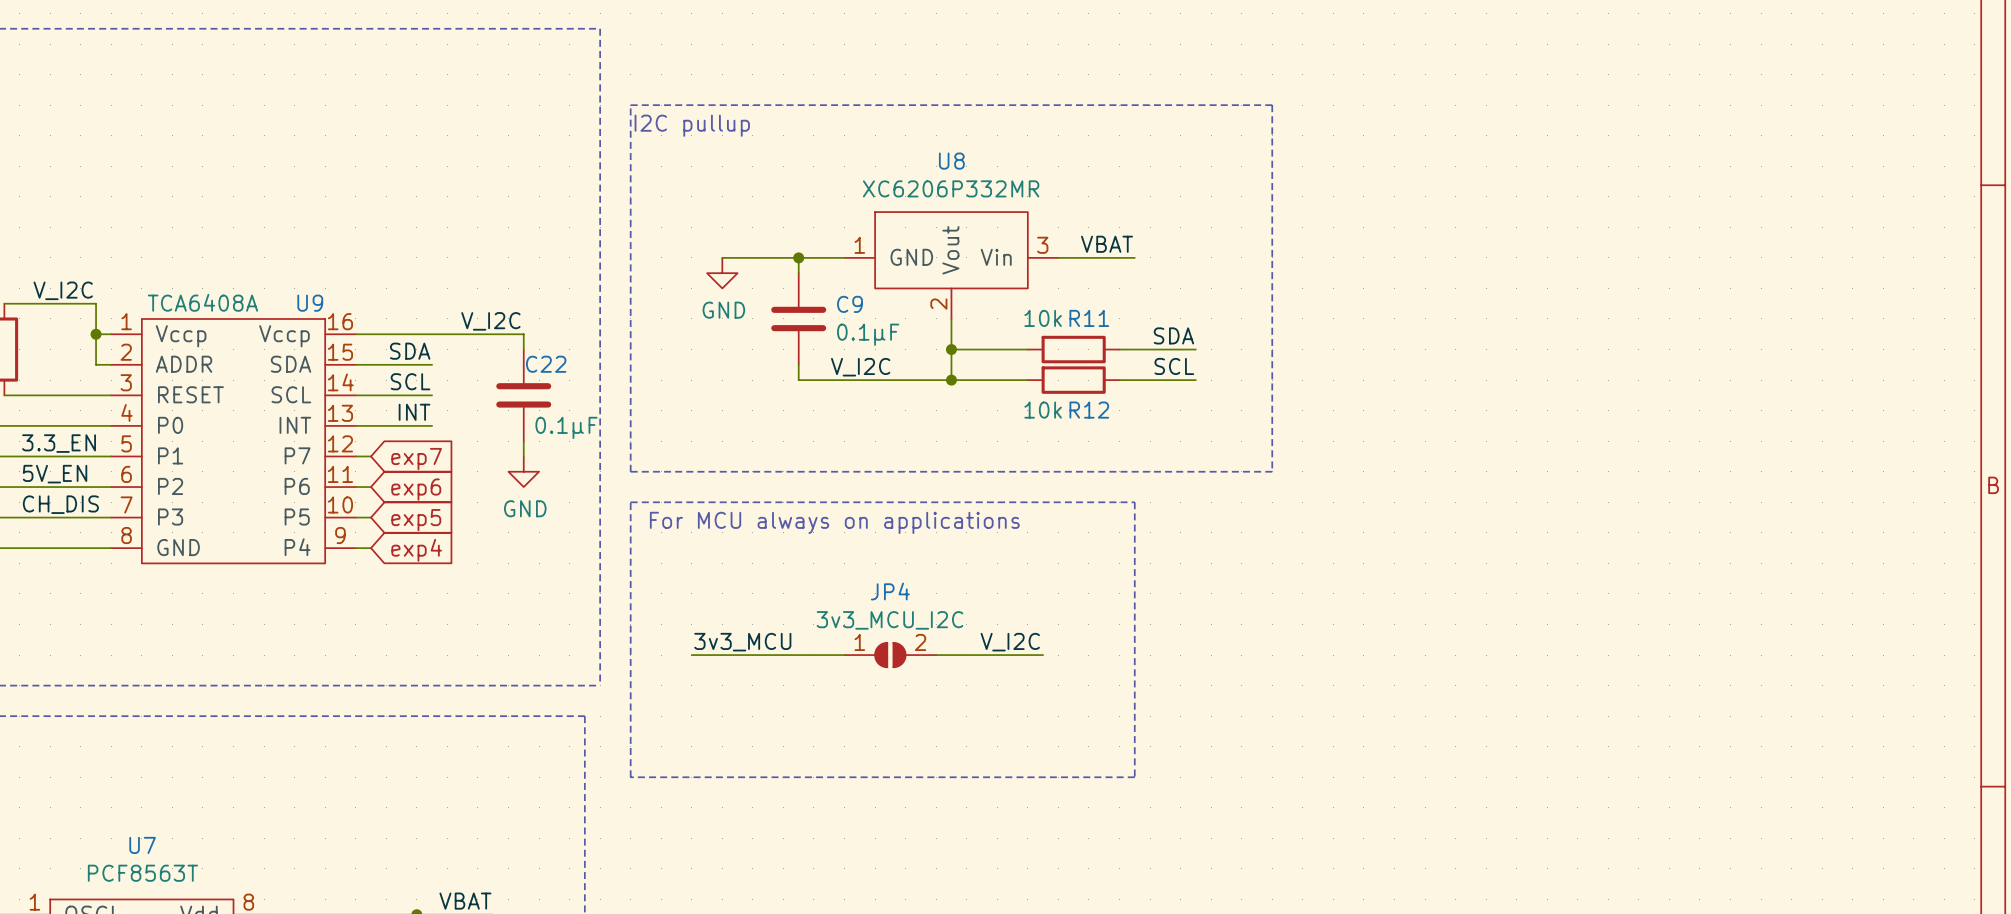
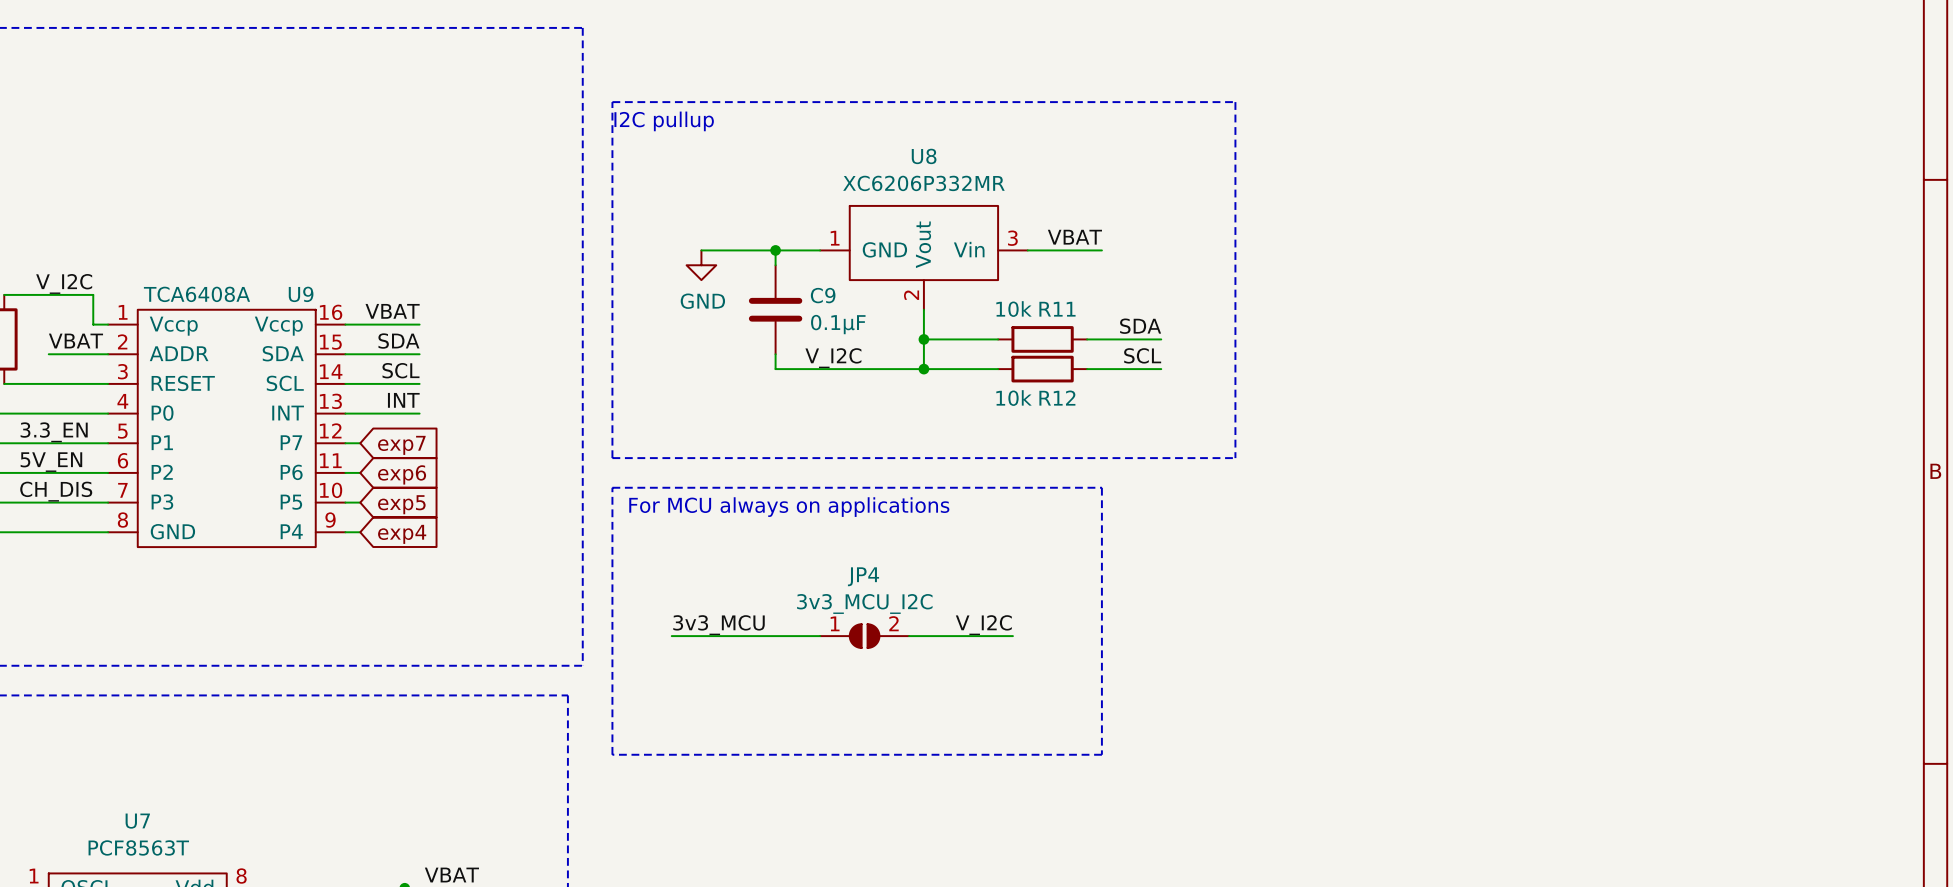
label: none -> VBAT (392, 311)
label: V_I2C (490, 321) -> none
wire: (96, 334) (96, 364) -> (48, 354) (93, 354)
junction: (96, 334) -> none
wire: (432, 334) (523, 334) (523, 349) -> none
label: none -> VBAT (75, 341)
C22: 0.1µF (523, 395) -> none
wire: (523, 441) (523, 456) -> none
power symbol: GND (523, 471) -> none

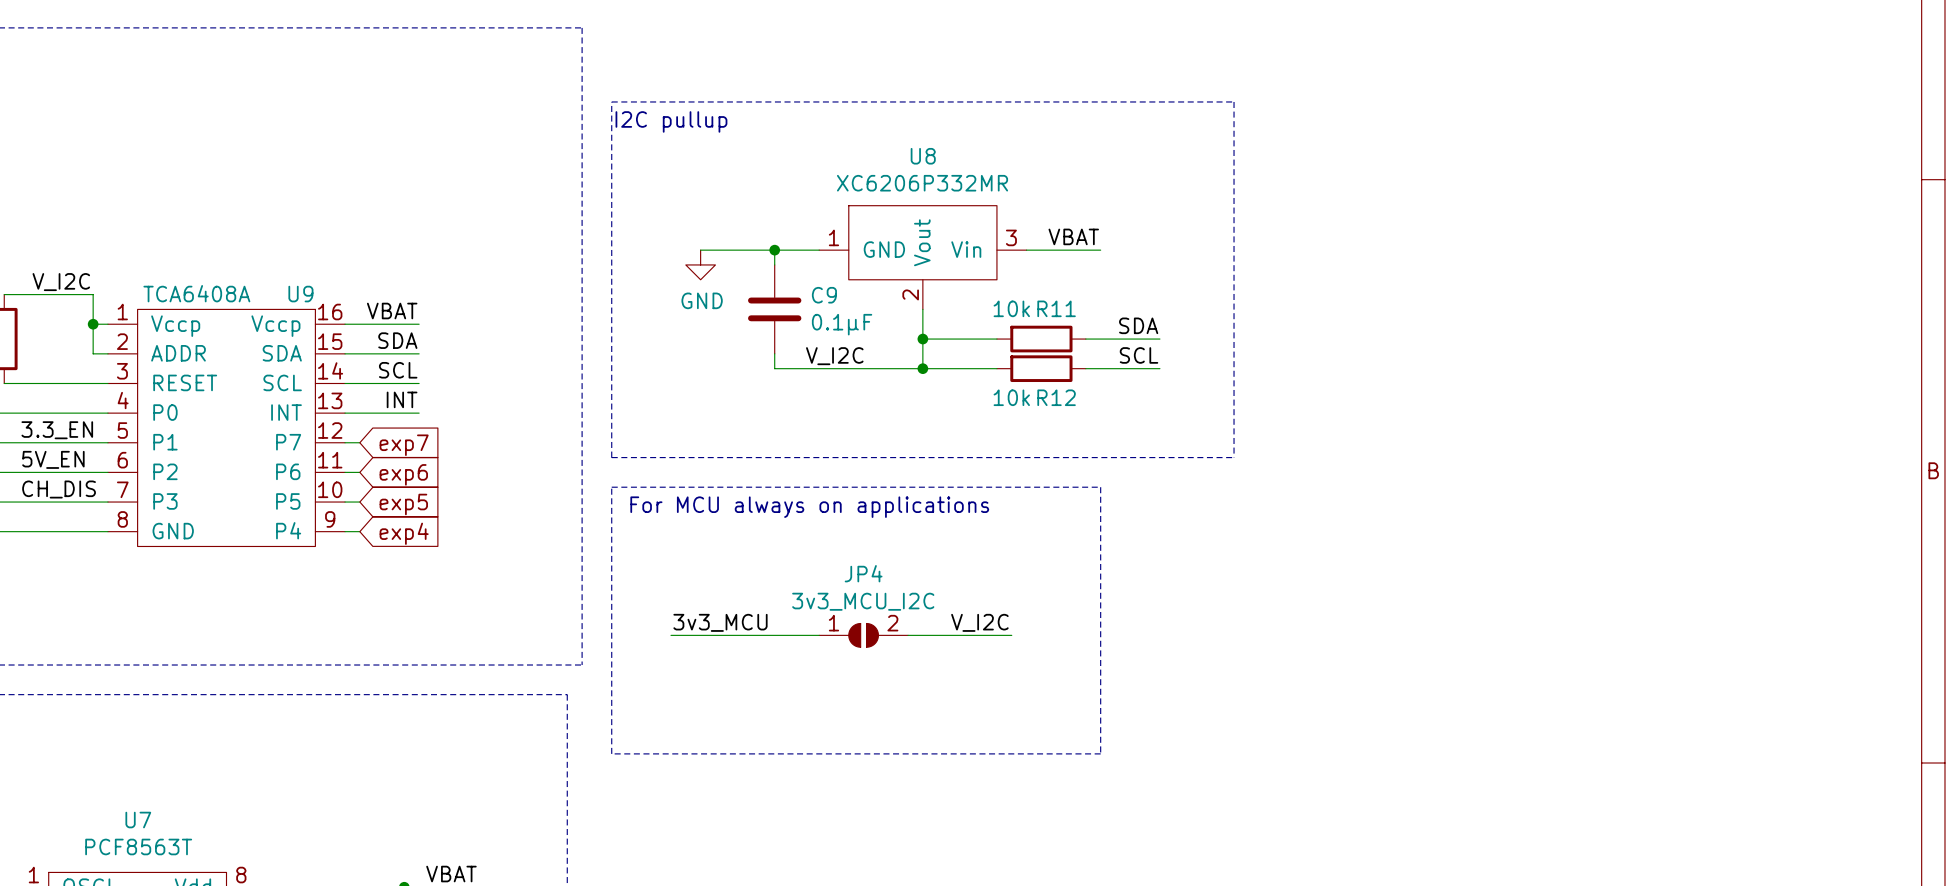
junction: none -> (93, 324)
label: VBAT (75, 341) -> none
wire: (48, 354) (93, 354) -> (93, 324) (93, 353)

